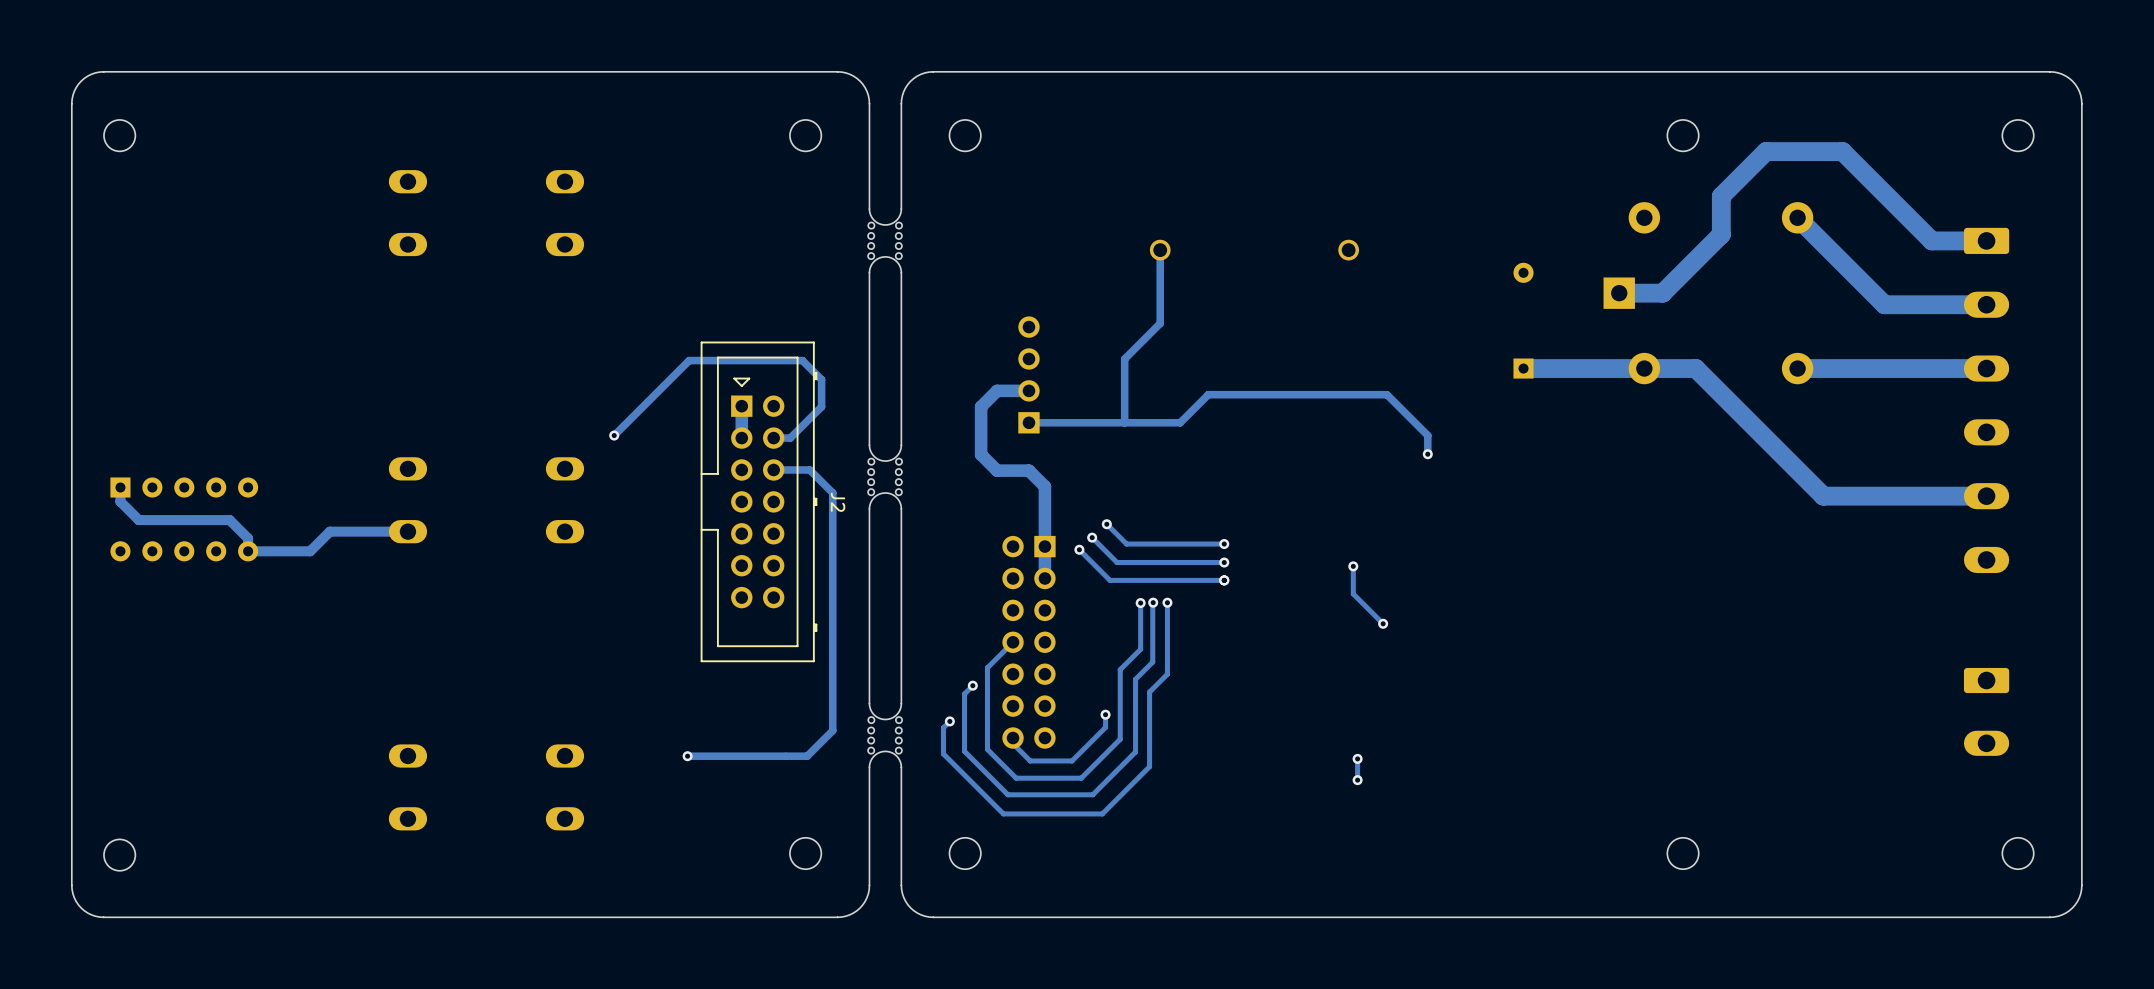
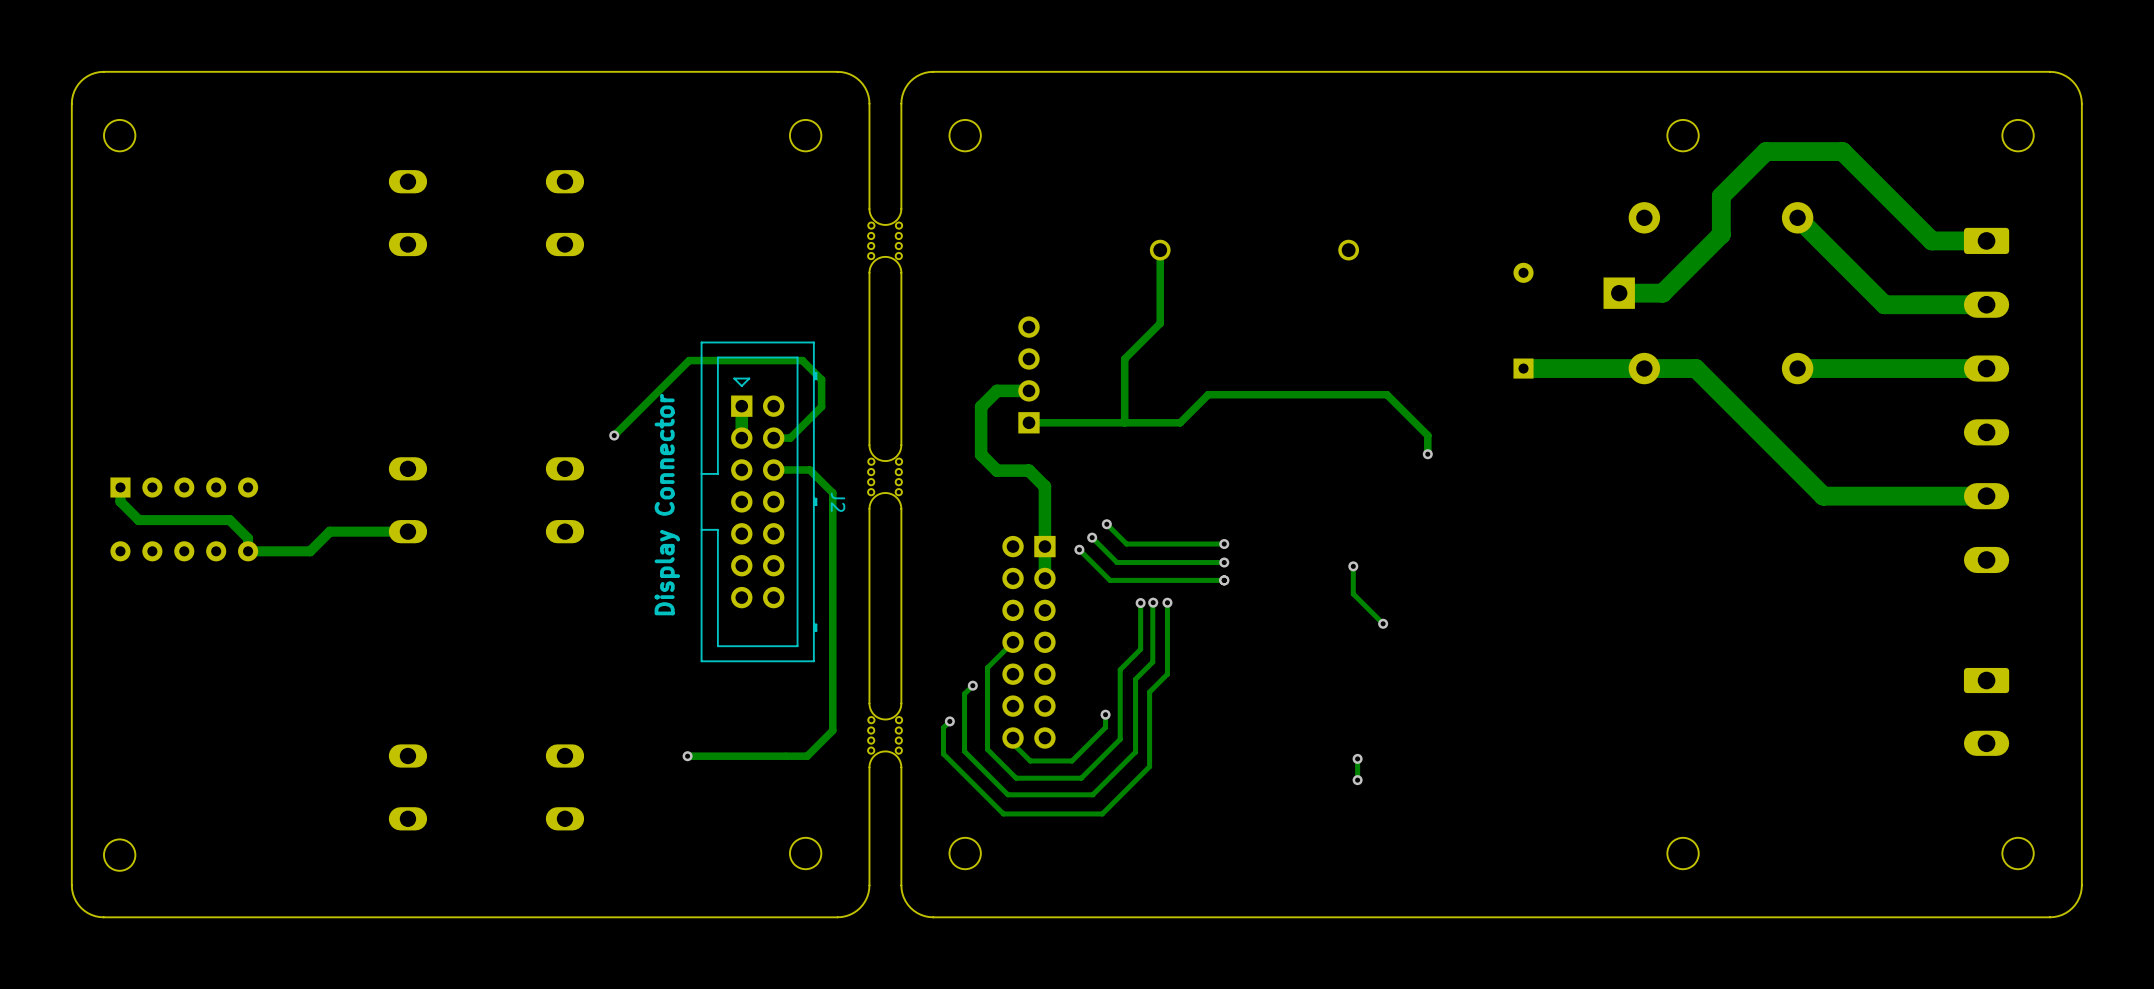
text: none -> Display Connector (667, 504)

